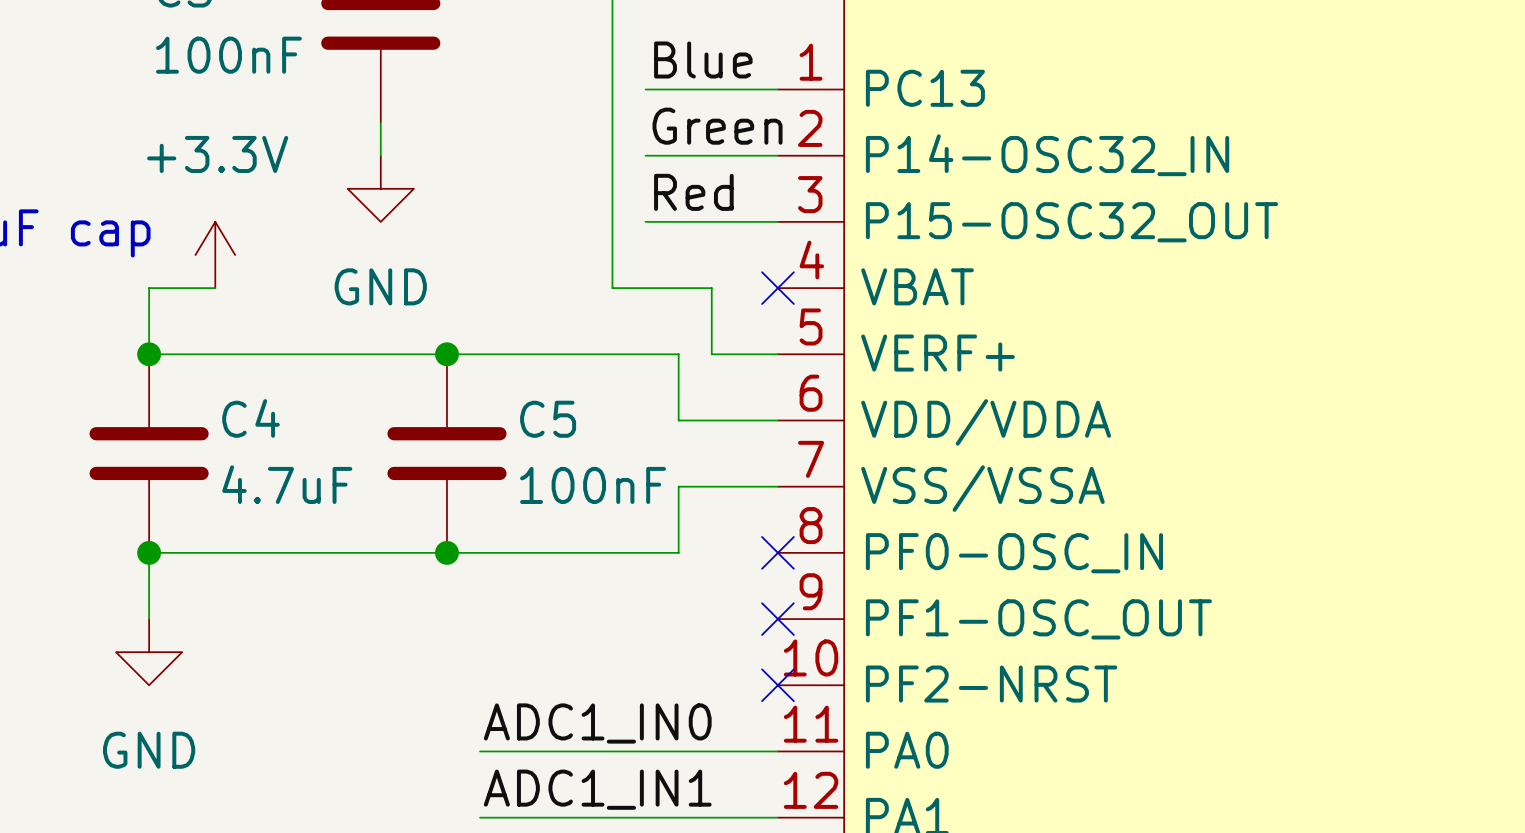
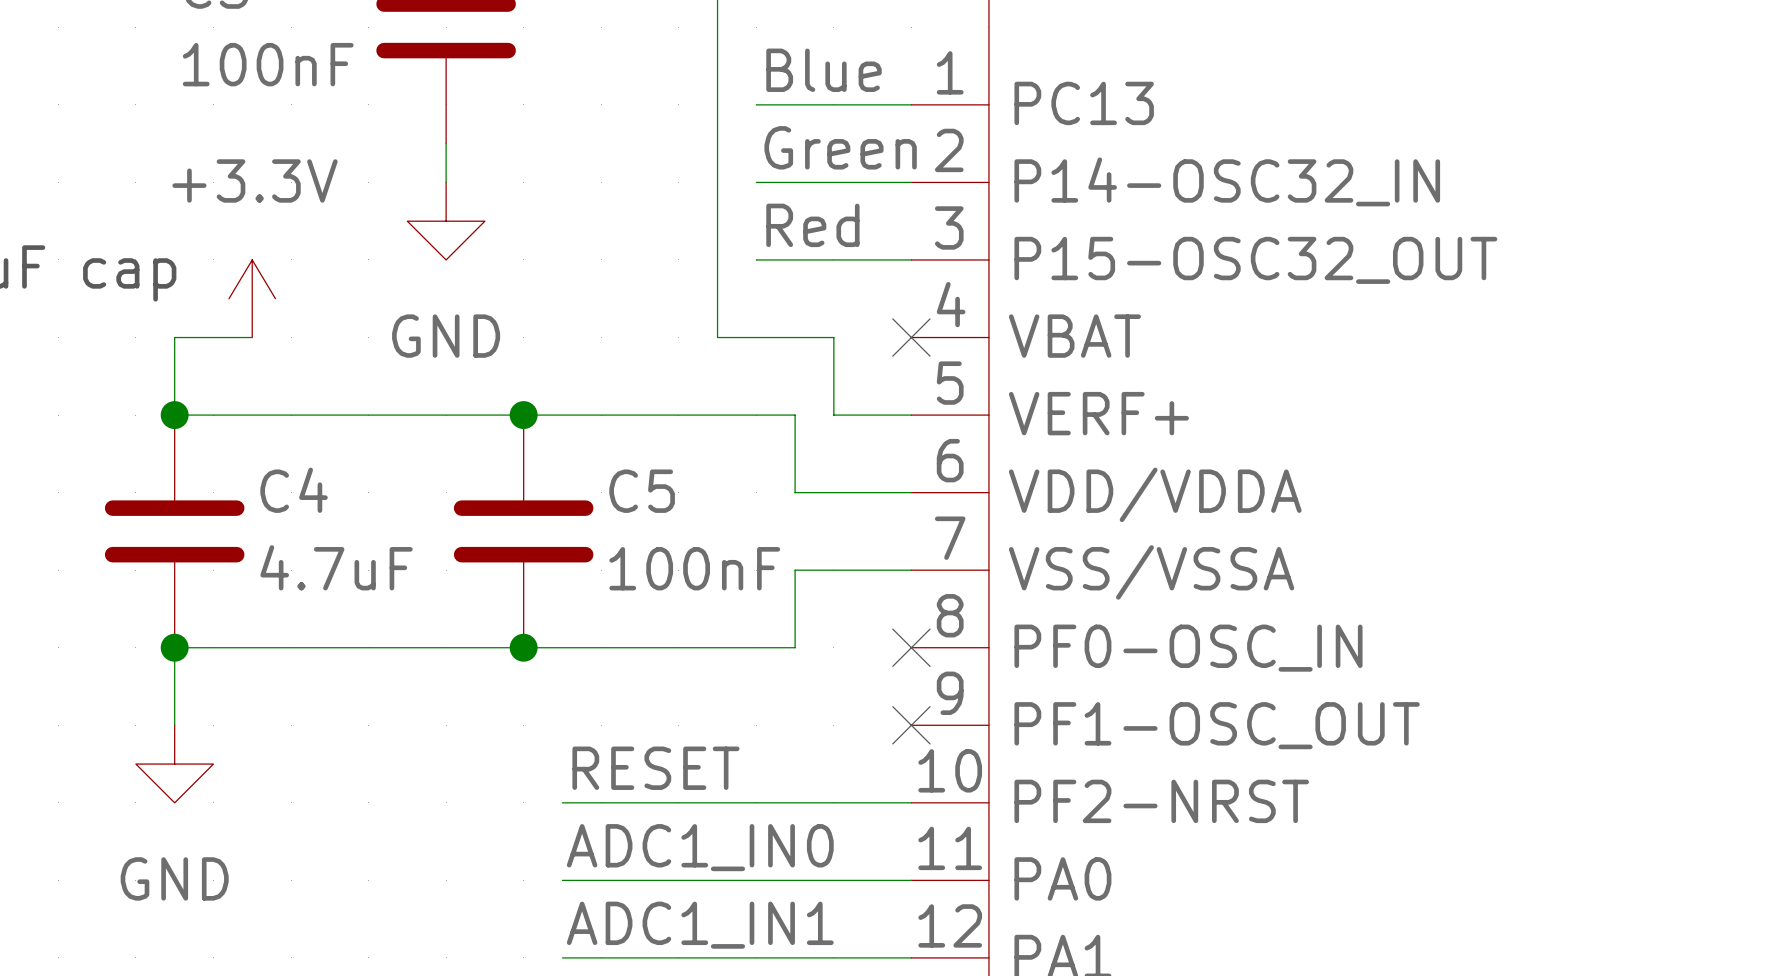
label: none -> RESET (655, 768)
wire: none -> (562, 802) (911, 802)
no-connect mark: (777, 685) -> none

